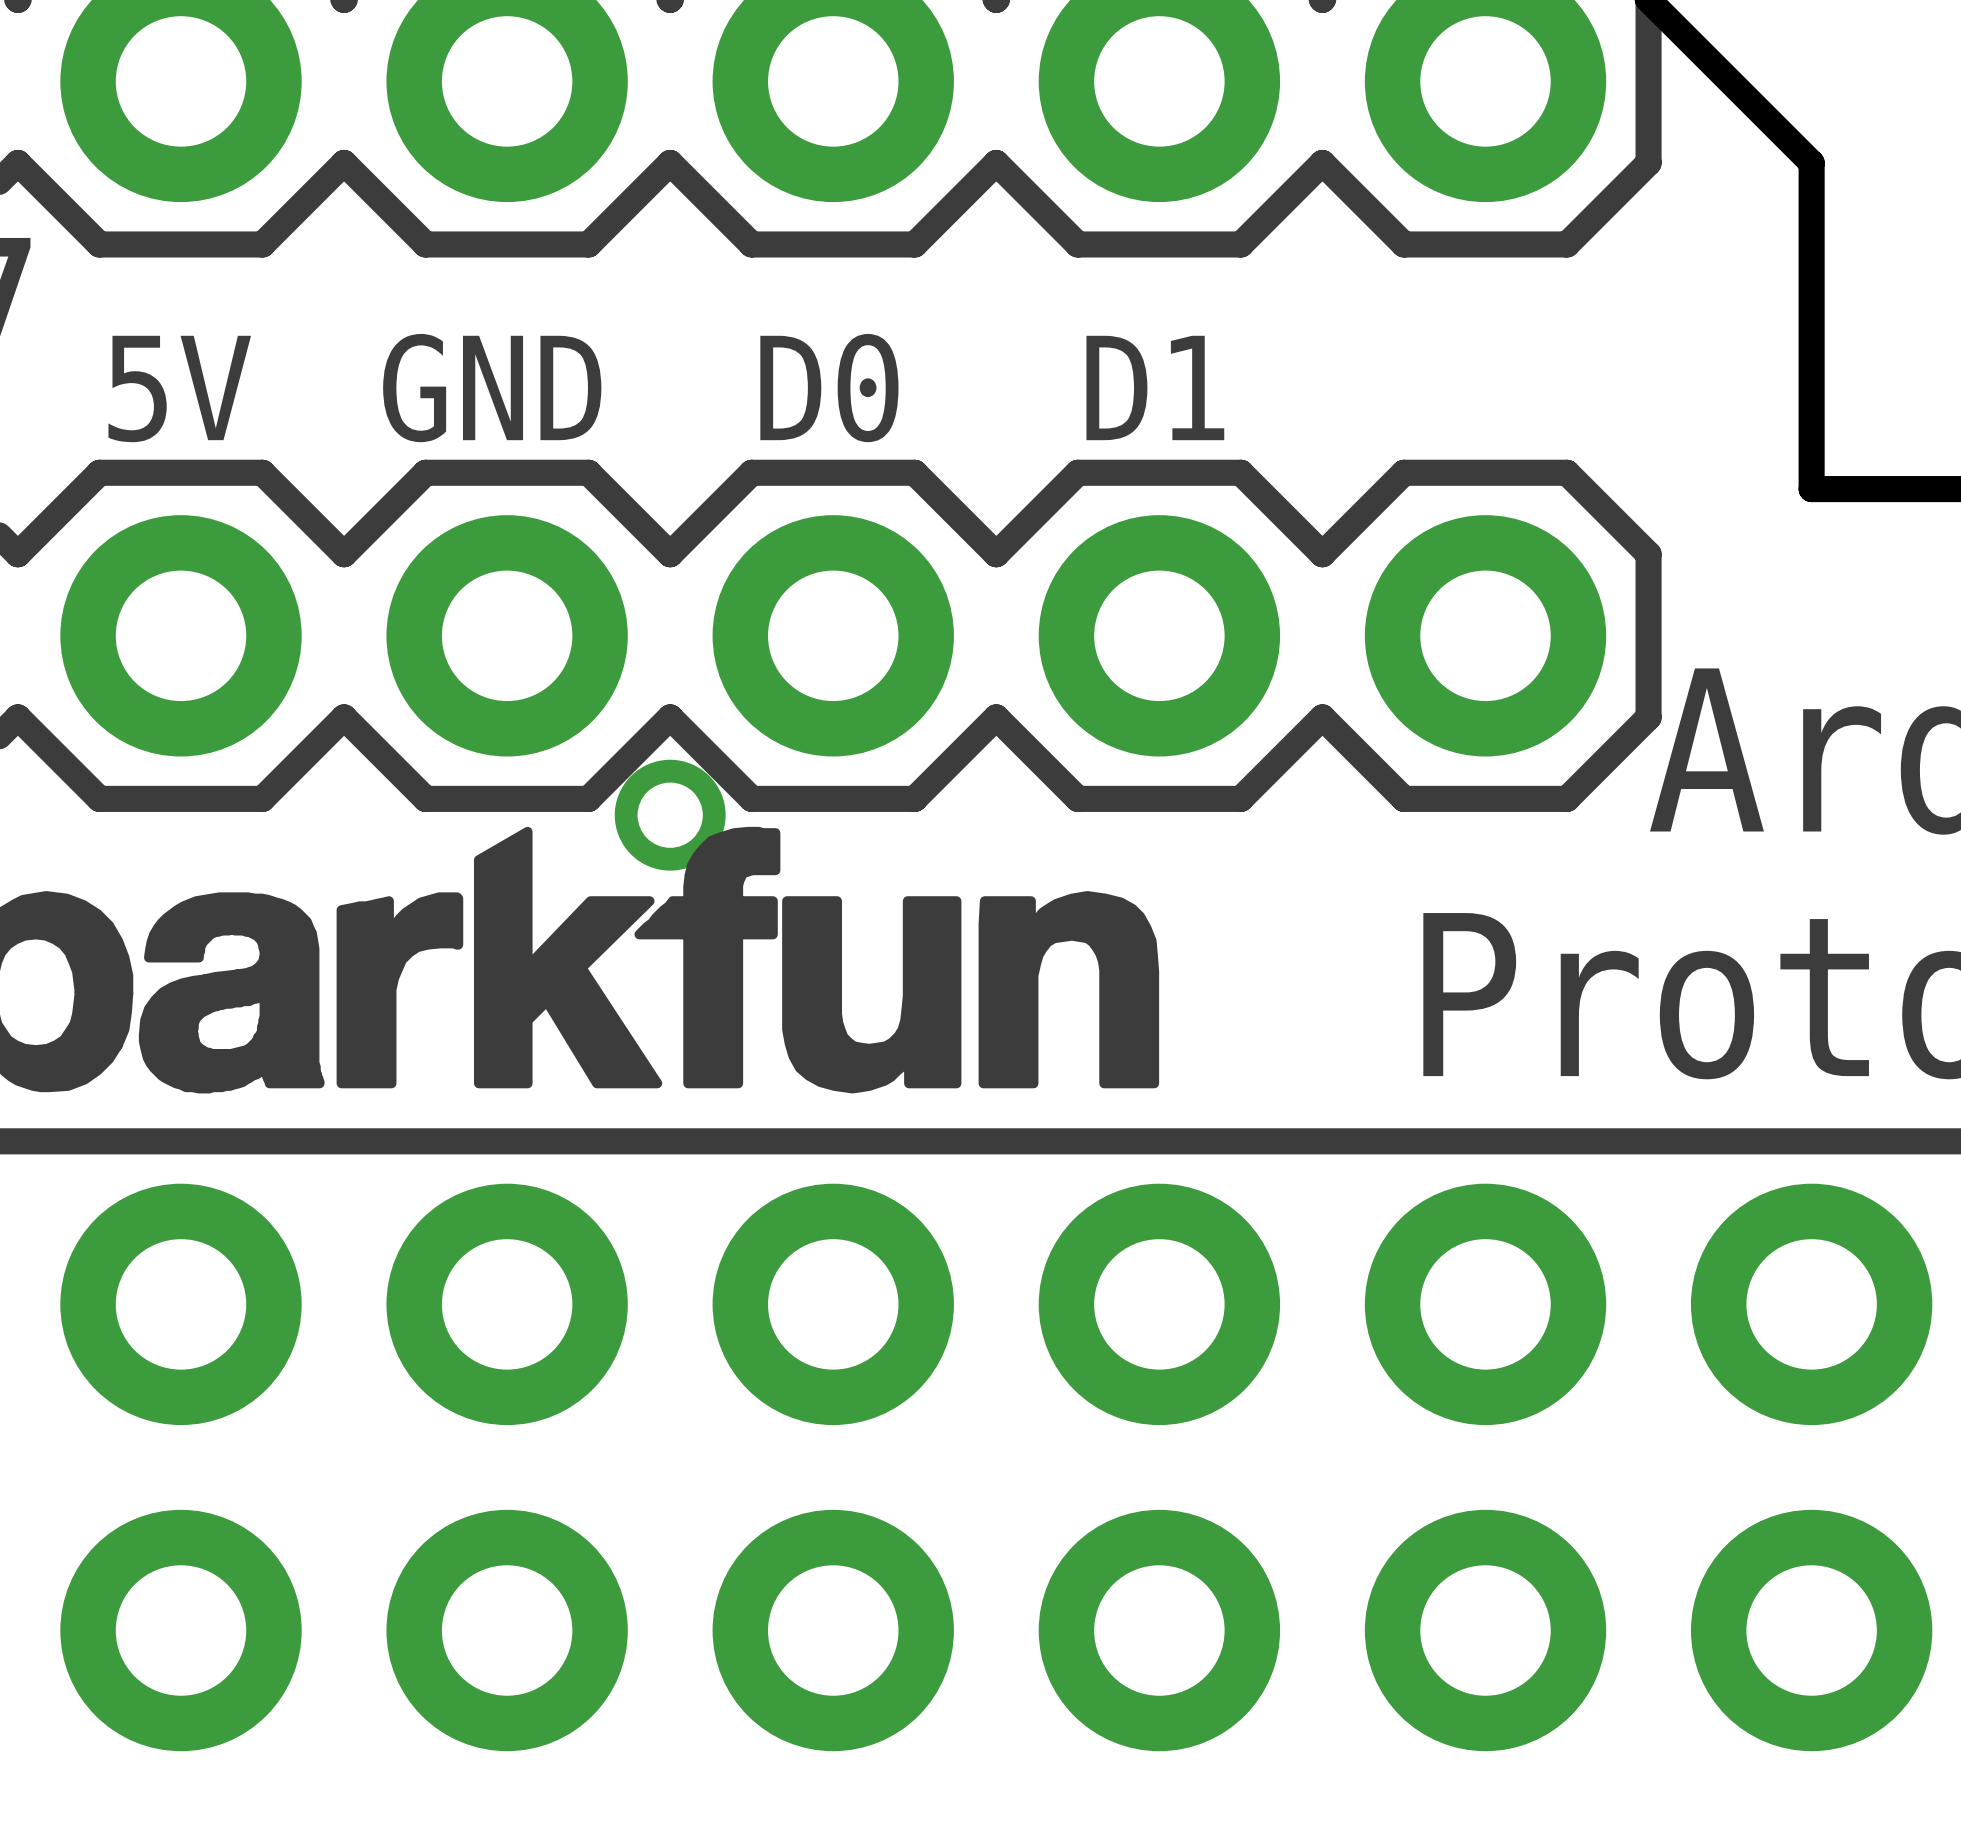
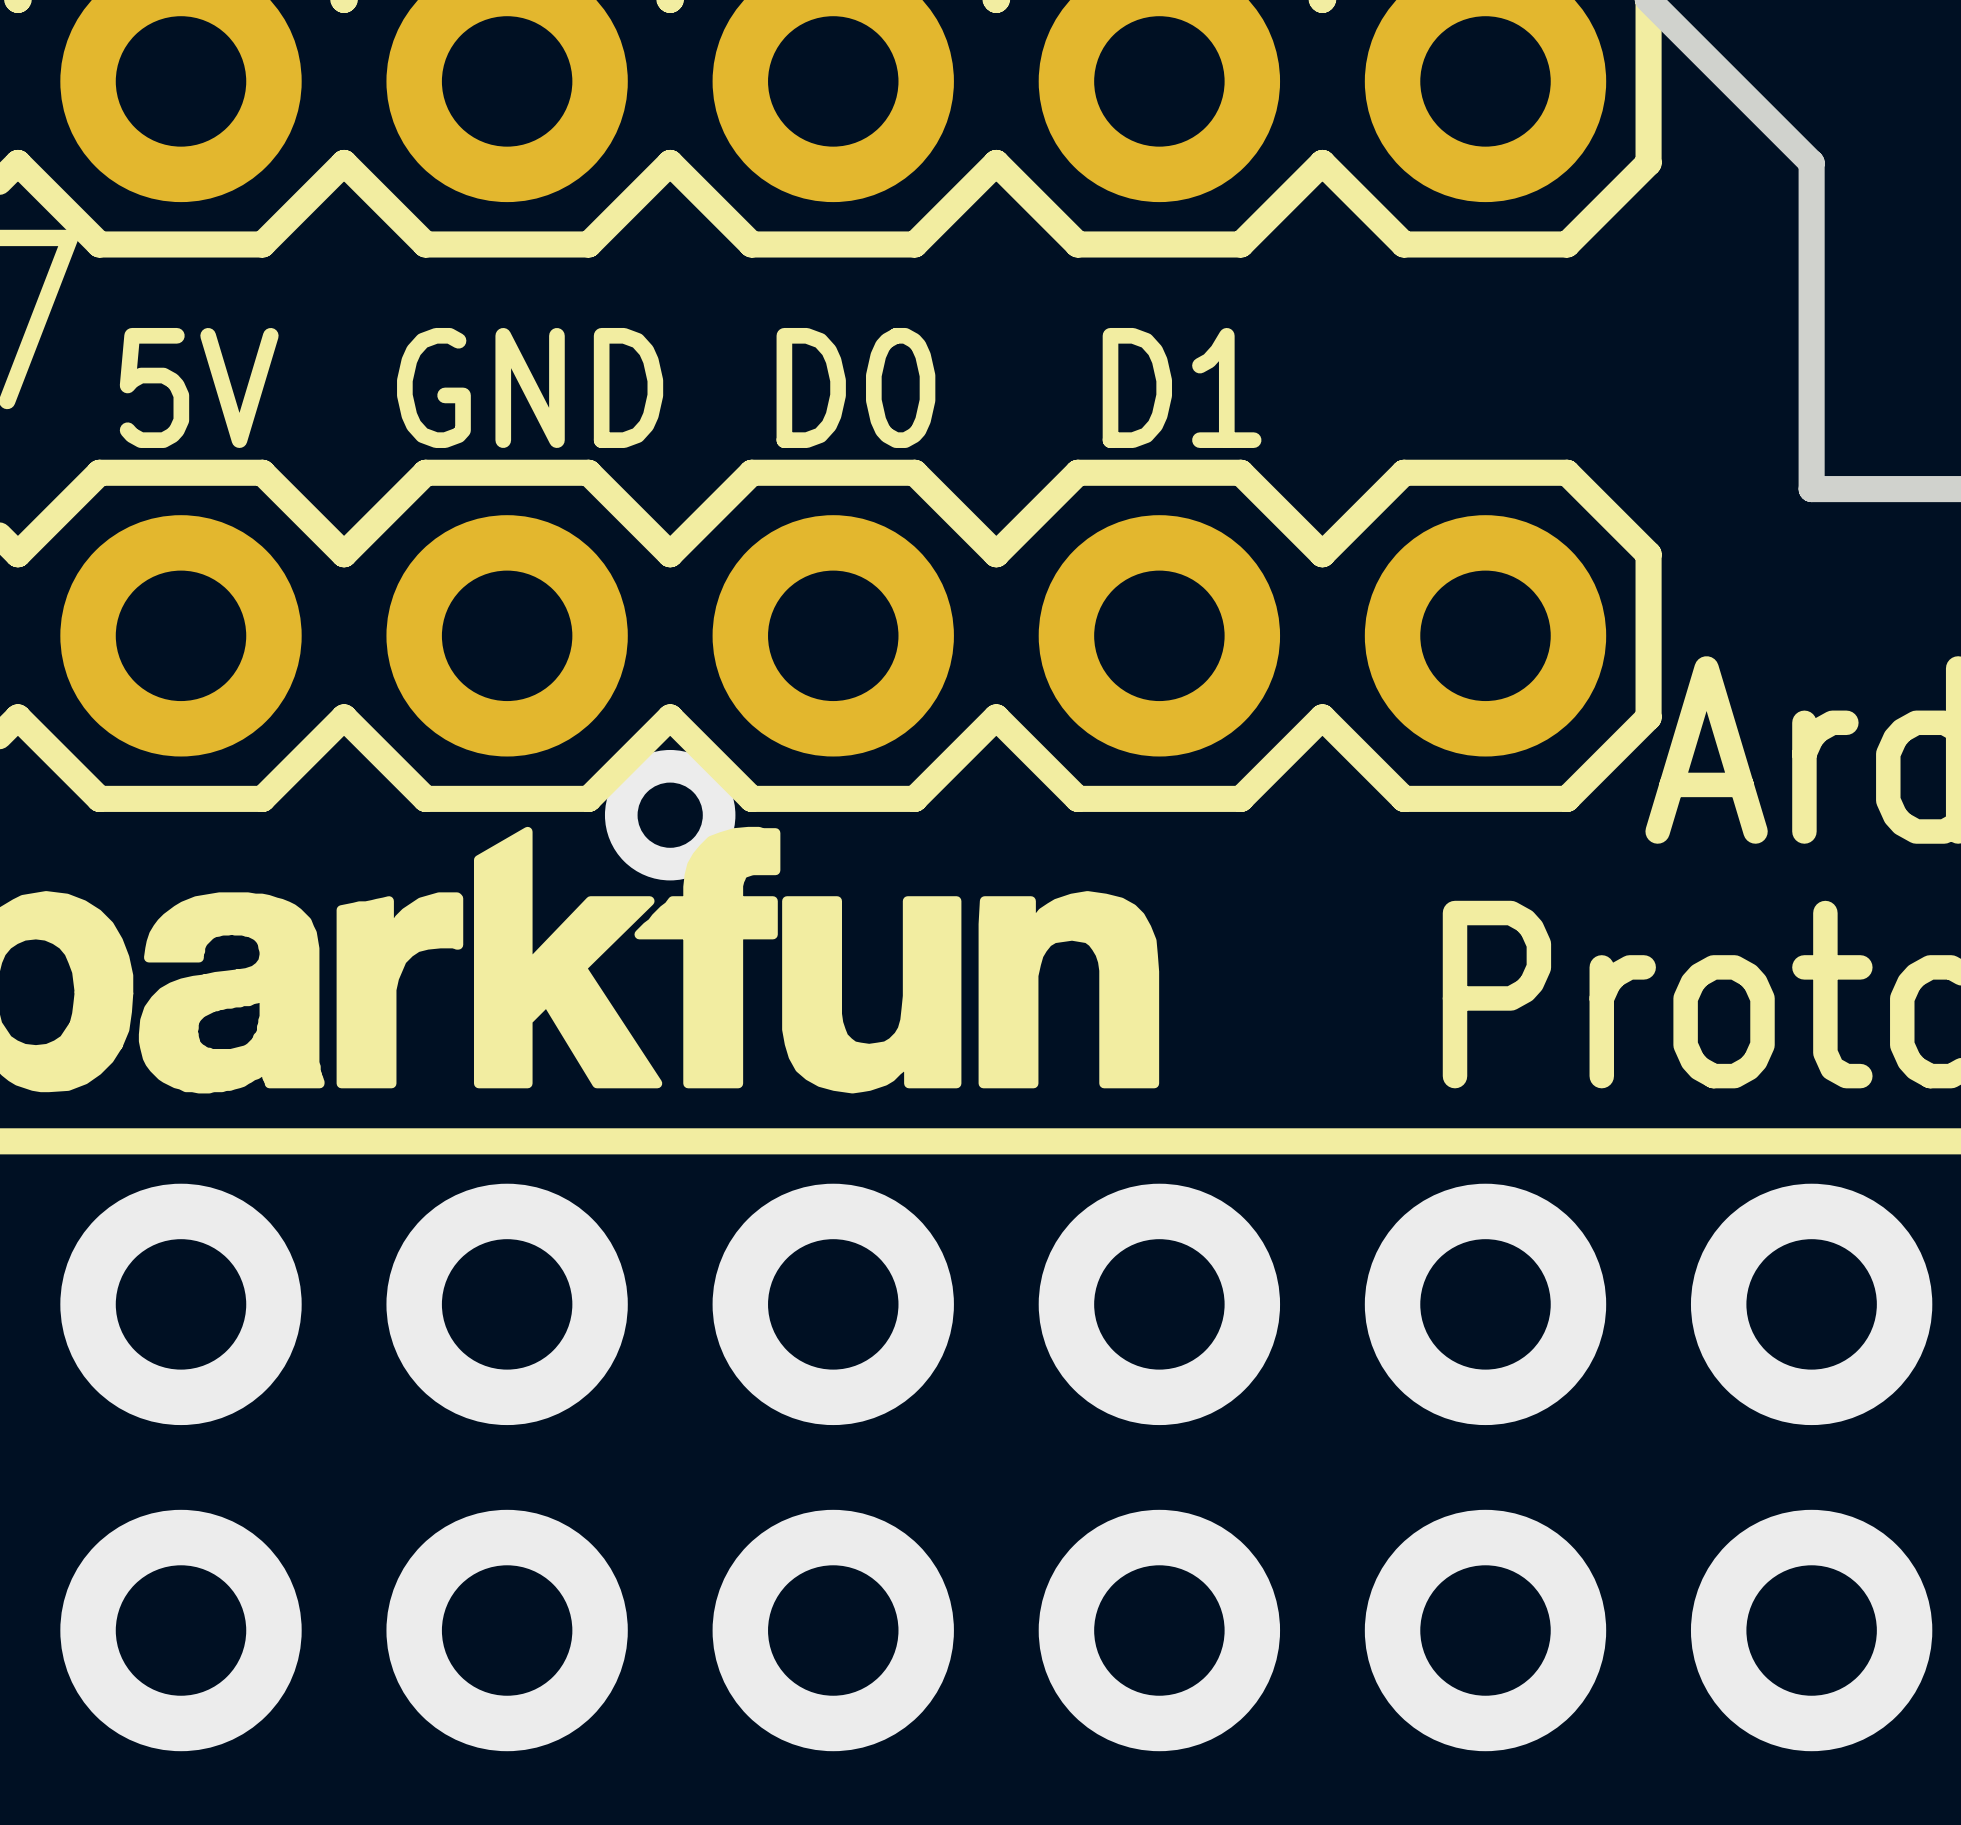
via size: [614, 759, 726, 871] -> [604, 749, 736, 881]

